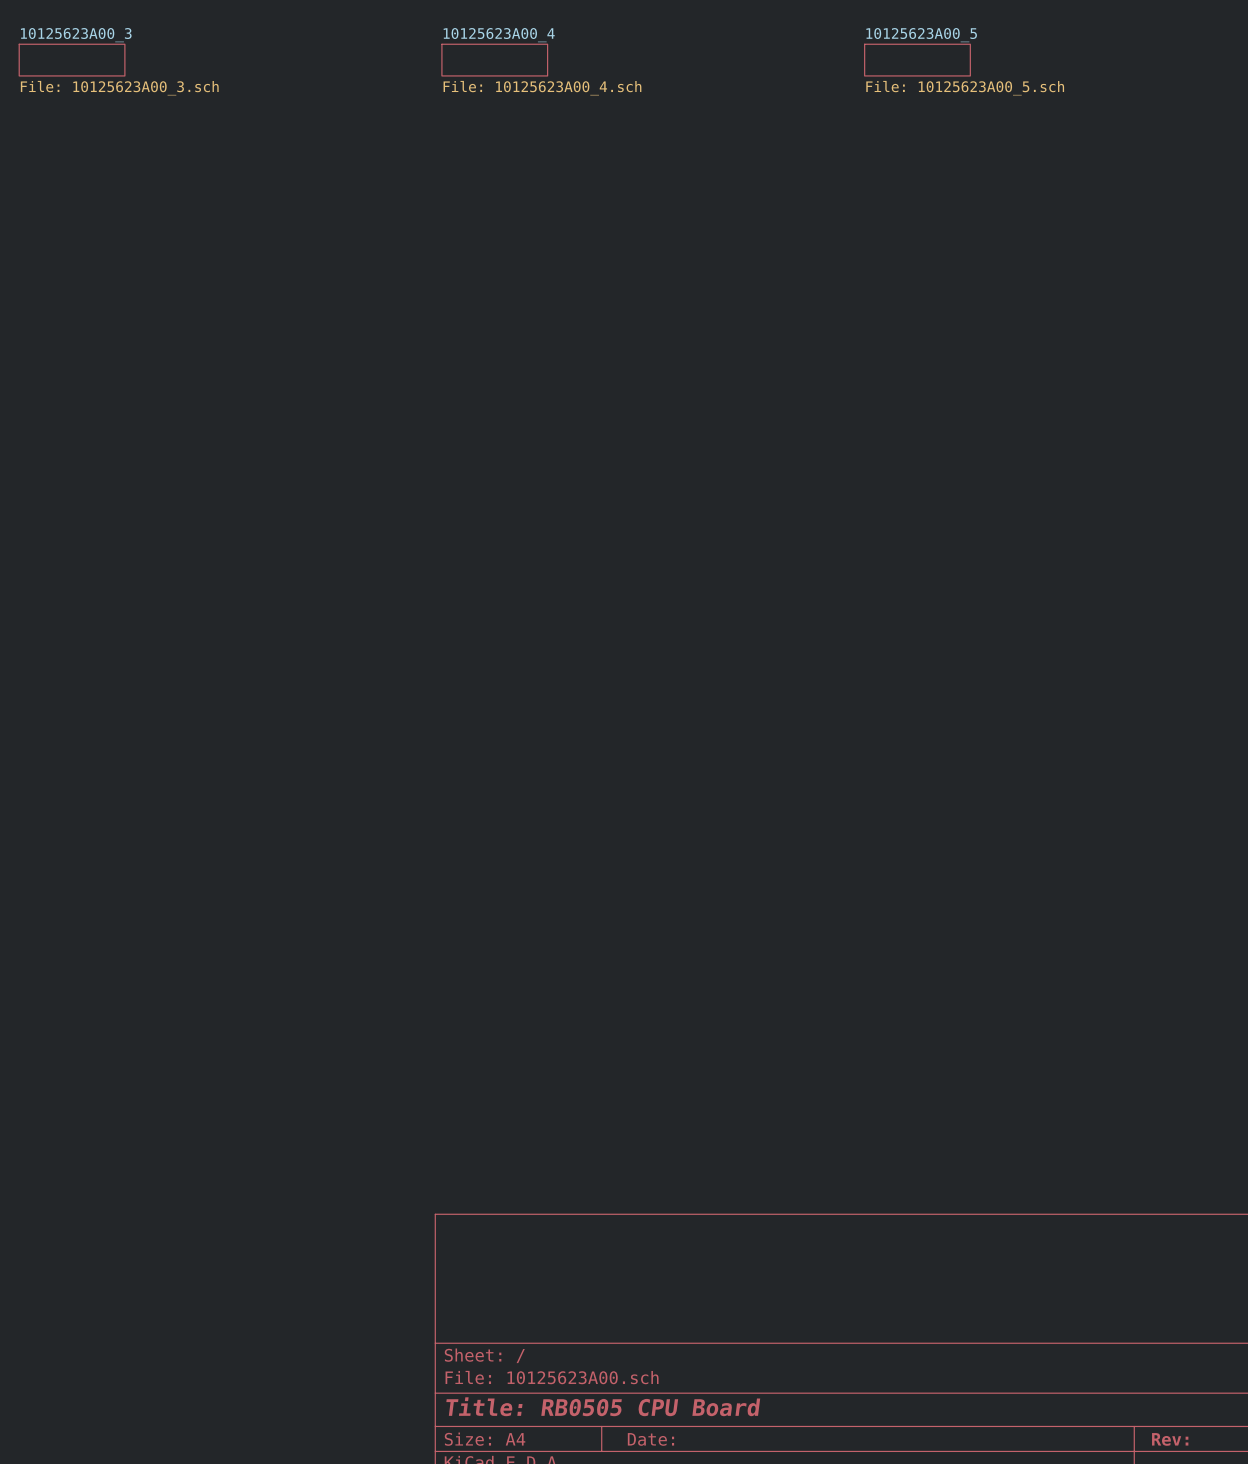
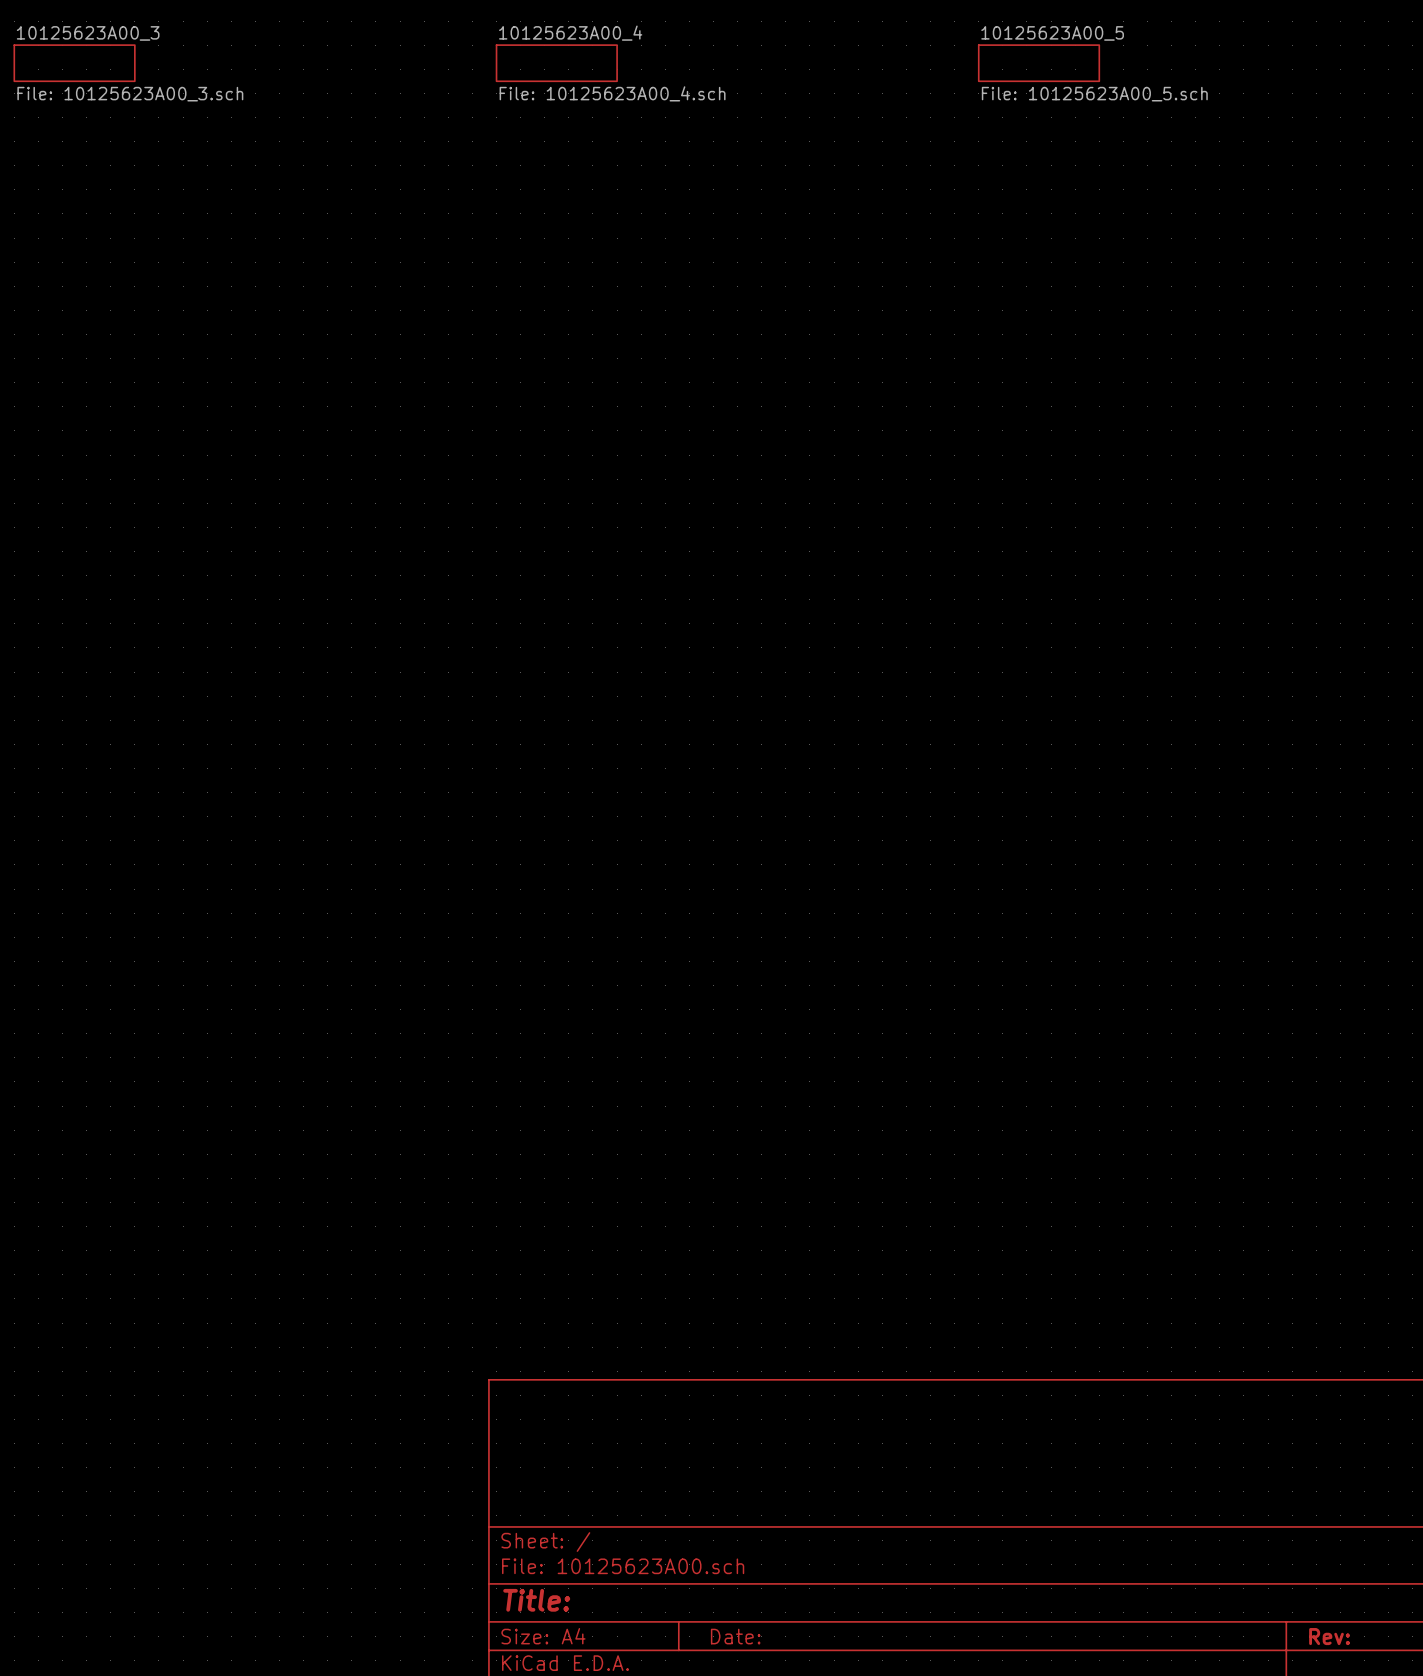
title block: Title: RB0505 CPU Board (603, 1406) -> Title: (536, 1600)

